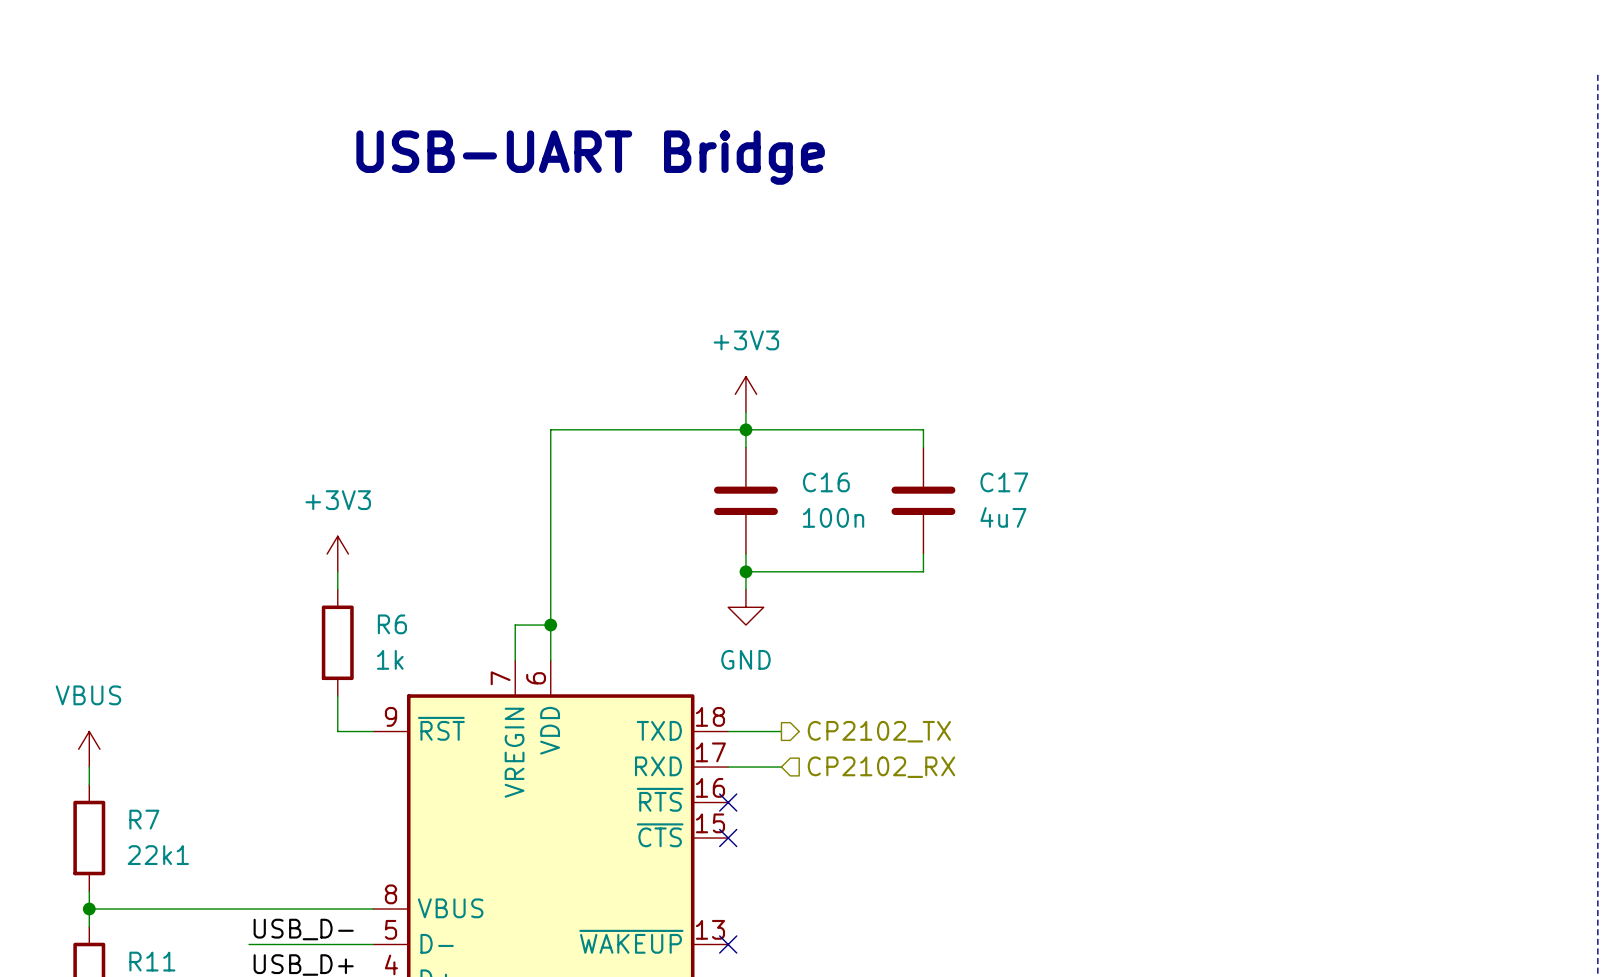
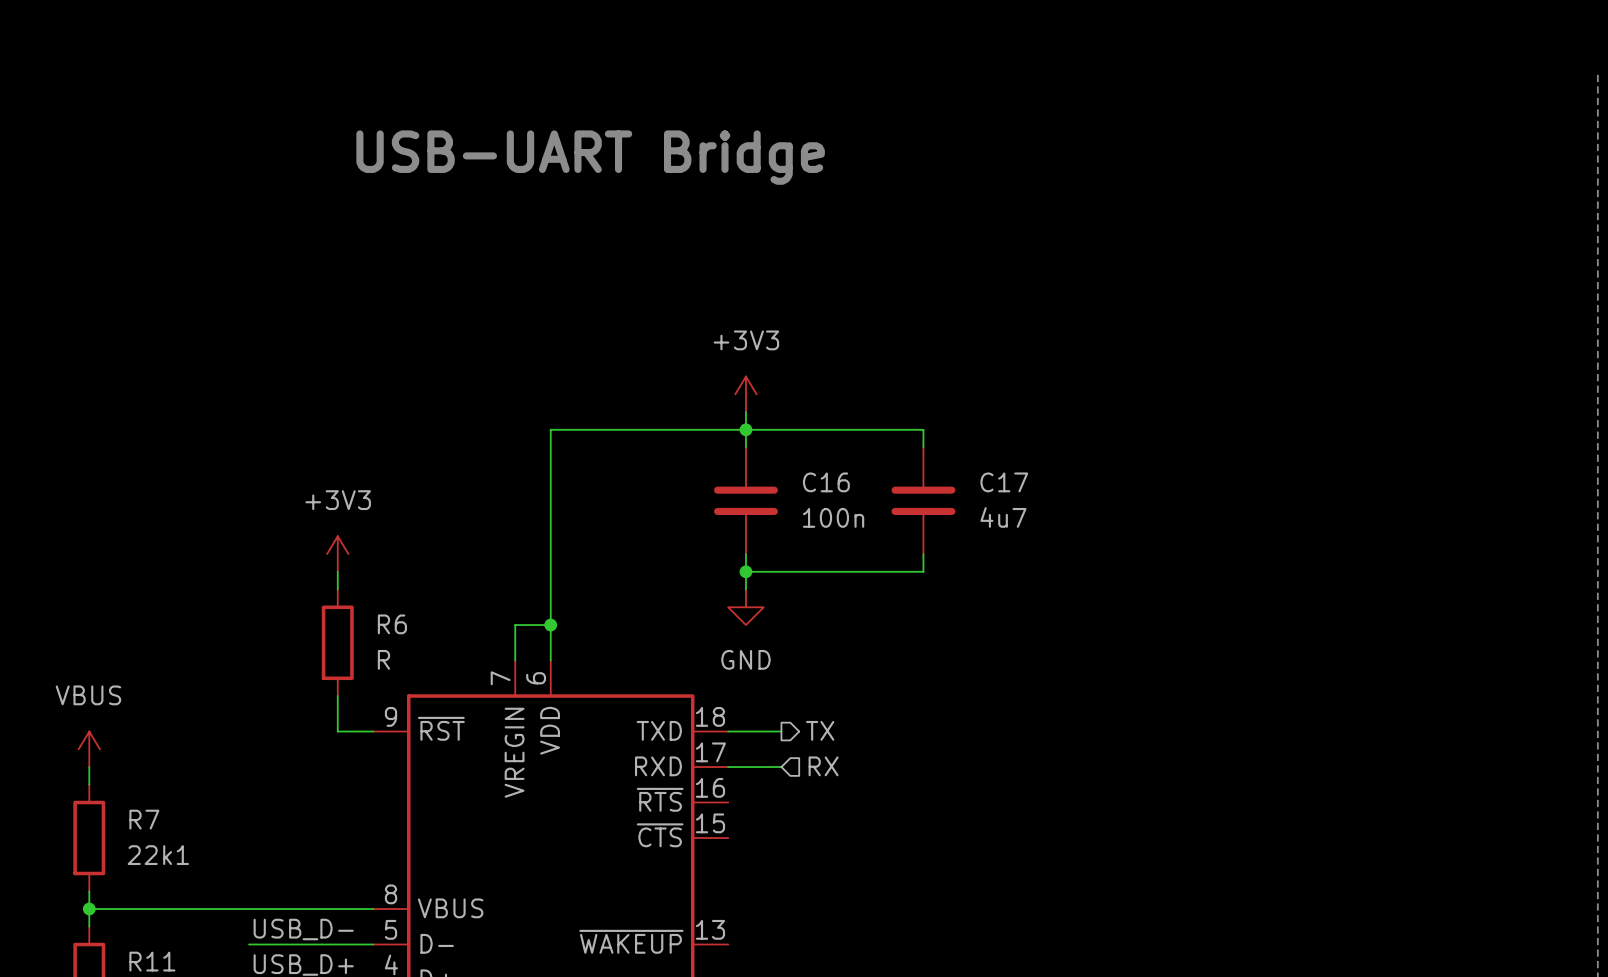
R6 value: 1k (390, 659) -> R (383, 659)
hierarchical label: CP2102_TX (879, 731) -> TX (820, 730)
hierarchical label: CP2102_RX (881, 767) -> RX (823, 766)
no-connect mark: (728, 802) -> none
no-connect mark: (728, 838) -> none
no-connect mark: (728, 944) -> none

